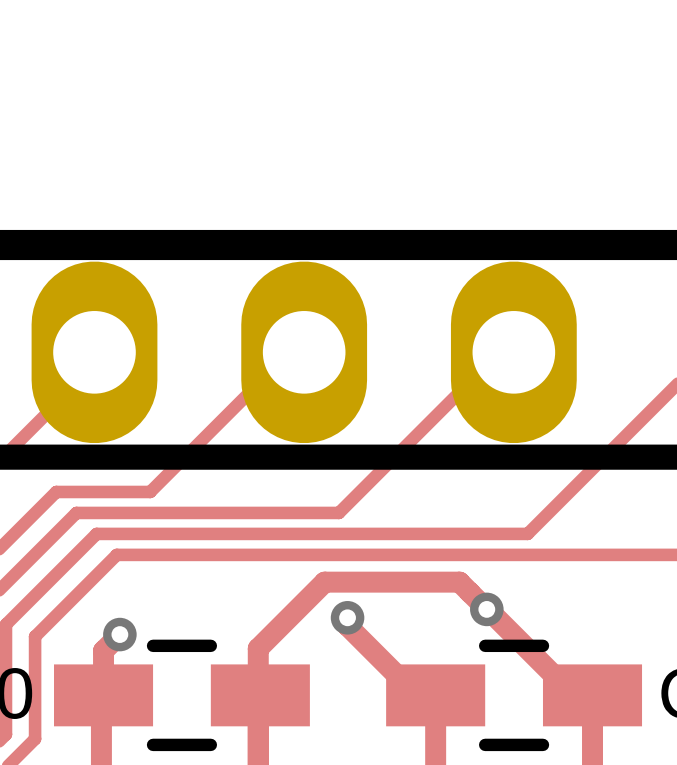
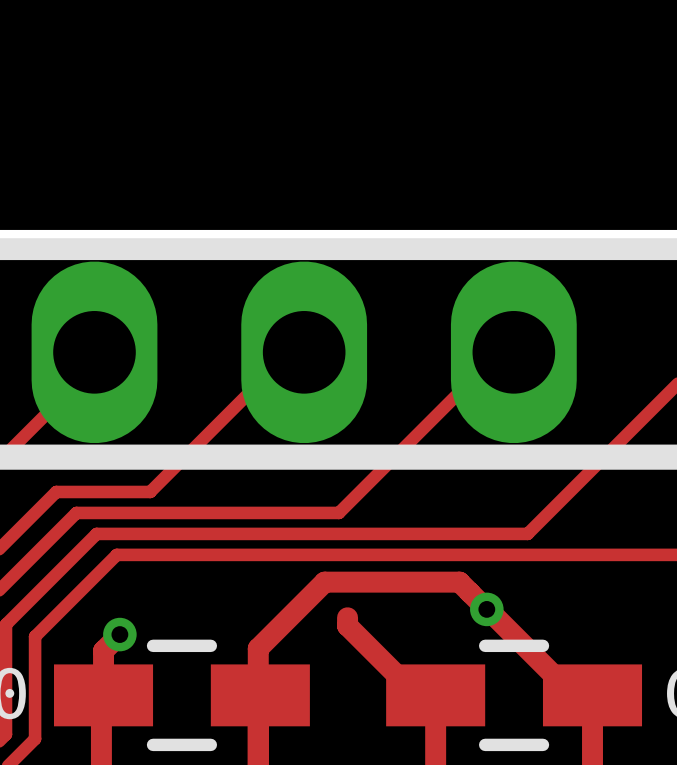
via: (347, 617) -> none

